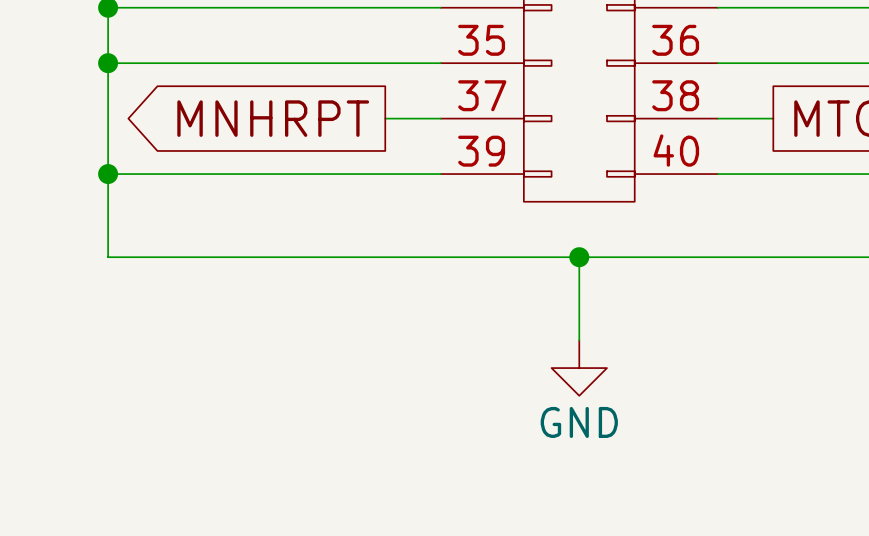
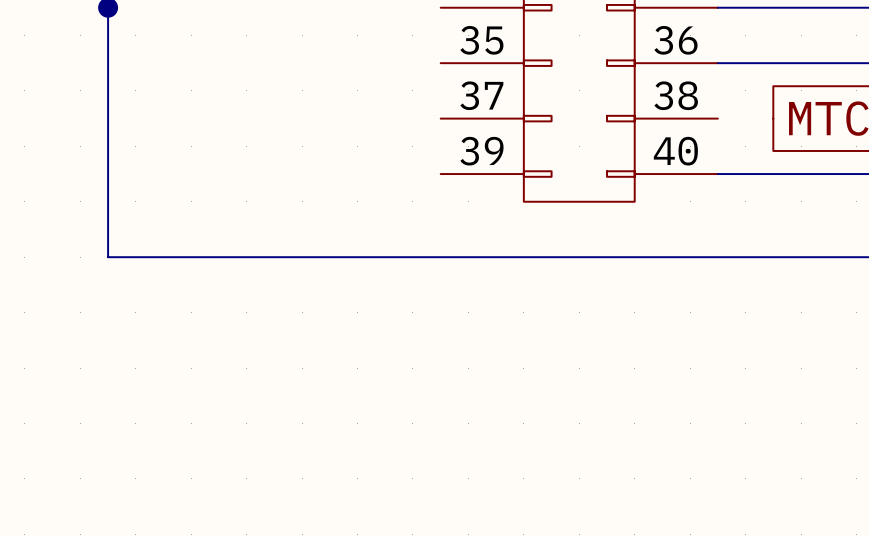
wire: (108, 7) (440, 7) -> none
wire: (108, 63) (440, 63) -> none
junction: (108, 63) -> none
global label: MNHRPT (273, 118) -> none
wire: (385, 118) (440, 118) -> none
wire: (717, 118) (773, 118) -> none
wire: (108, 174) (440, 174) -> none
junction: (108, 174) -> none
wire: (579, 257) (579, 340) -> none
junction: (579, 257) -> none
power symbol: GND (579, 368) -> none

